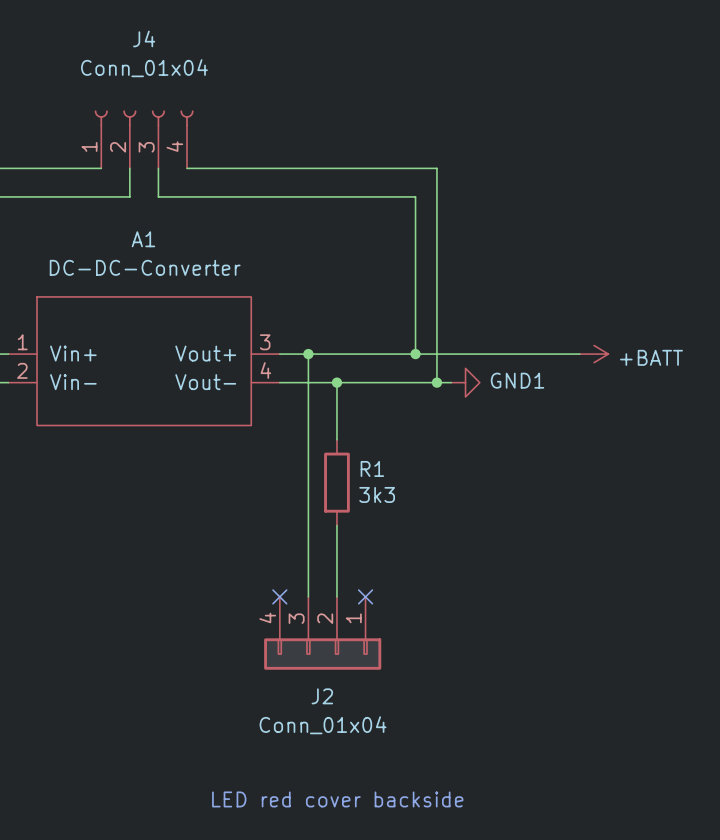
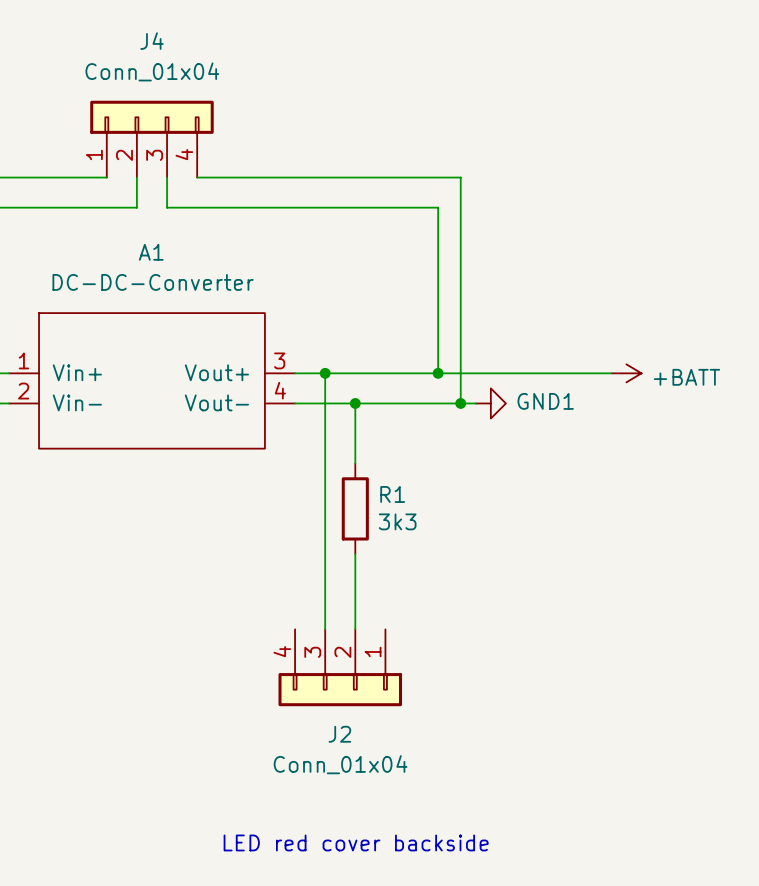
J4 symbol: [94, 110, 194, 169] -> [90, 100, 214, 178]
no-connect mark: (279, 596) -> none
no-connect mark: (365, 596) -> none

